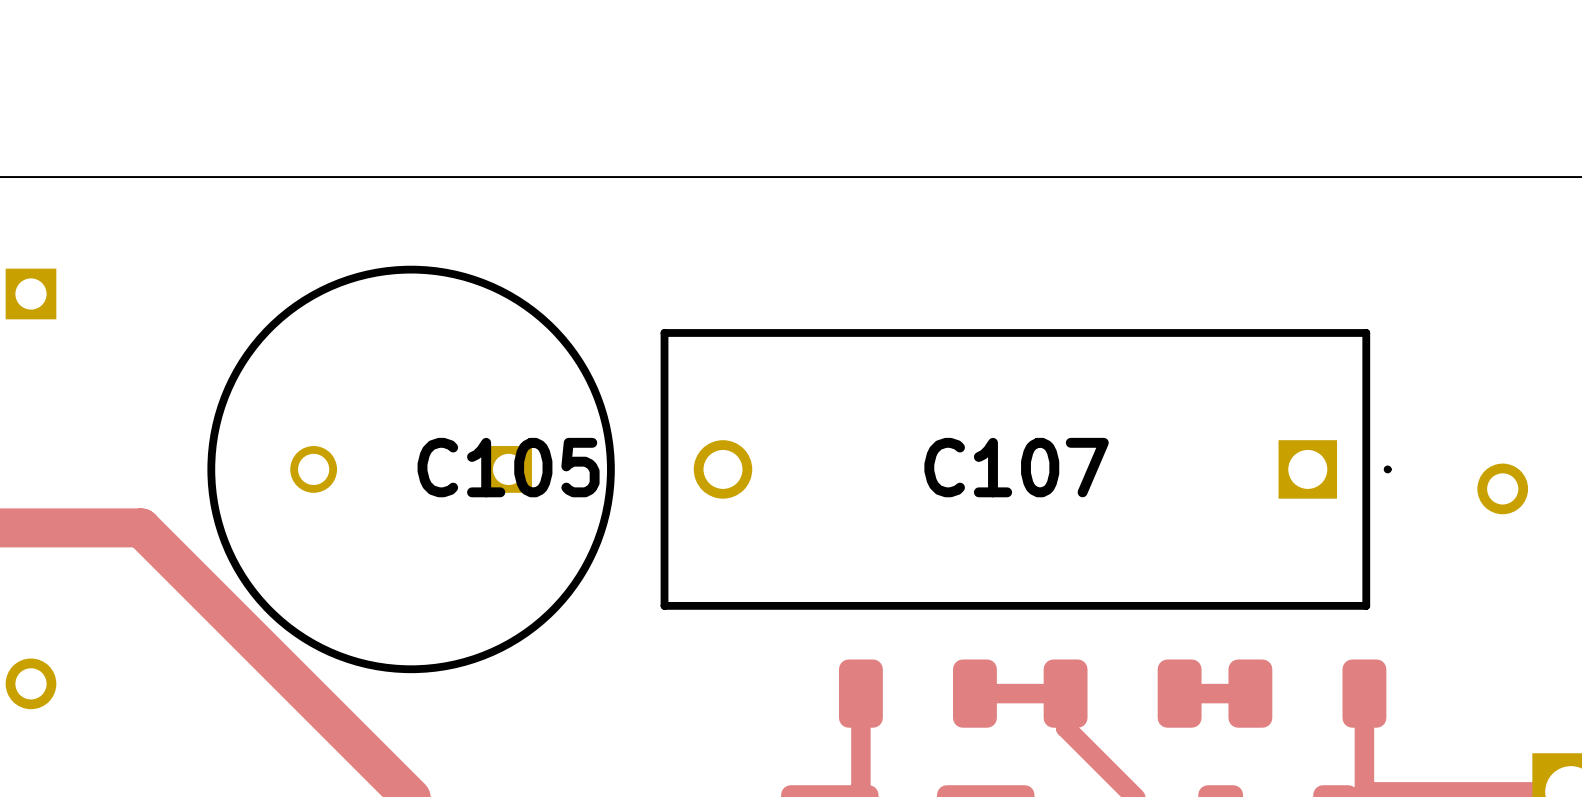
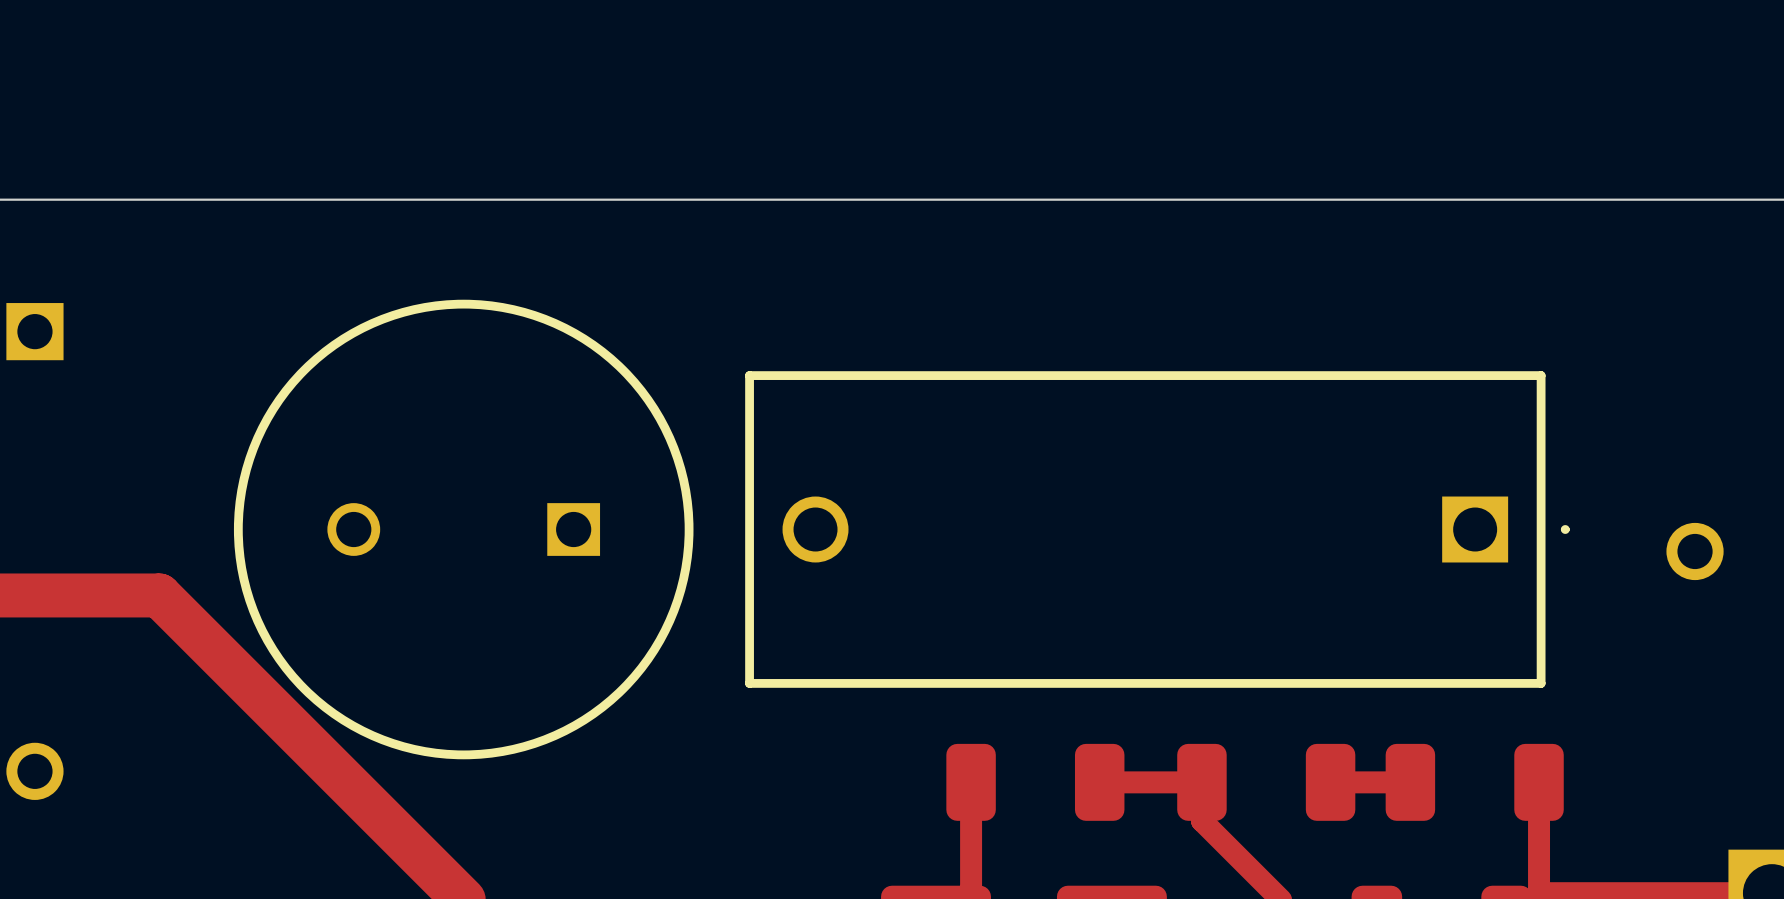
C105 name: C105 (508, 467) -> none
C107 name: C107 (1016, 467) -> none

